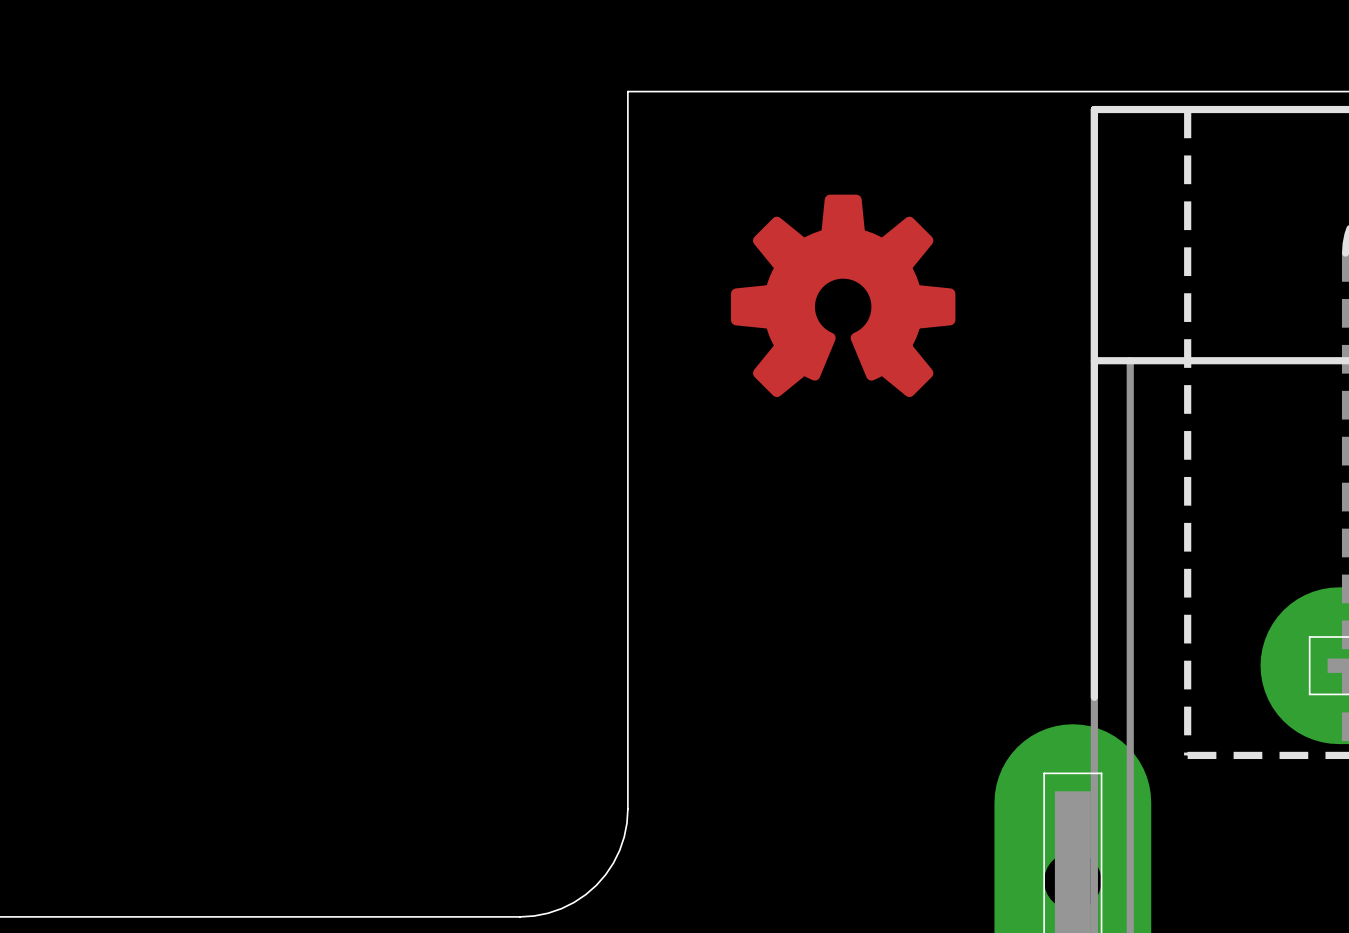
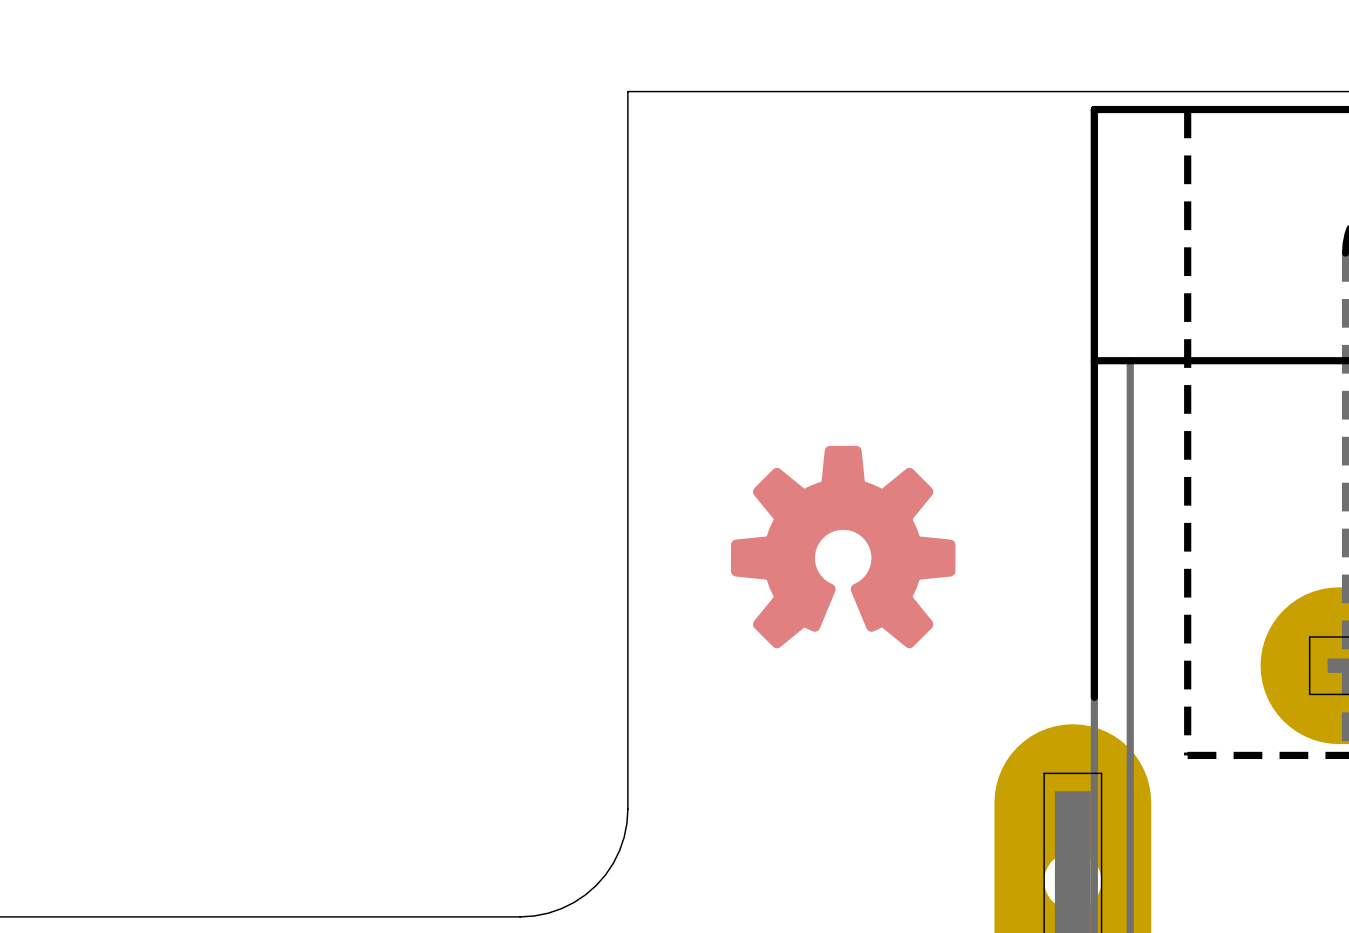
drawing position: (843, 295) -> (843, 547)

